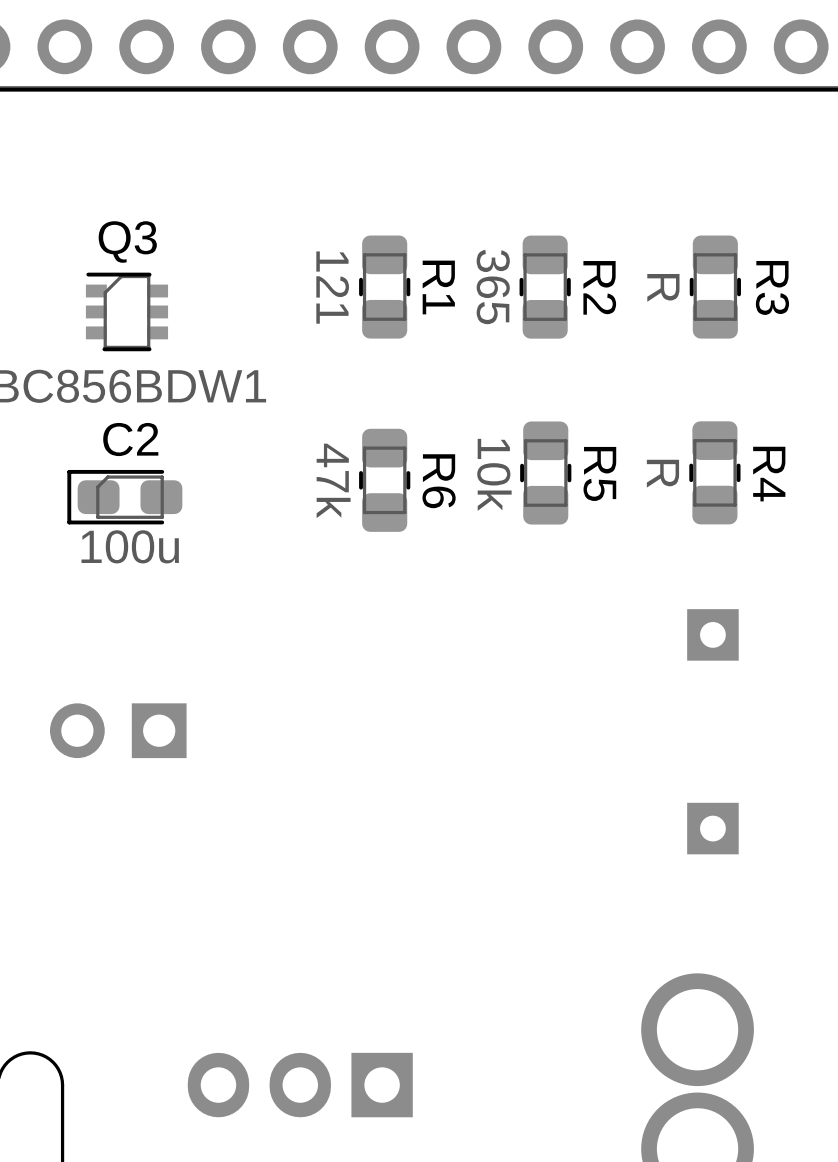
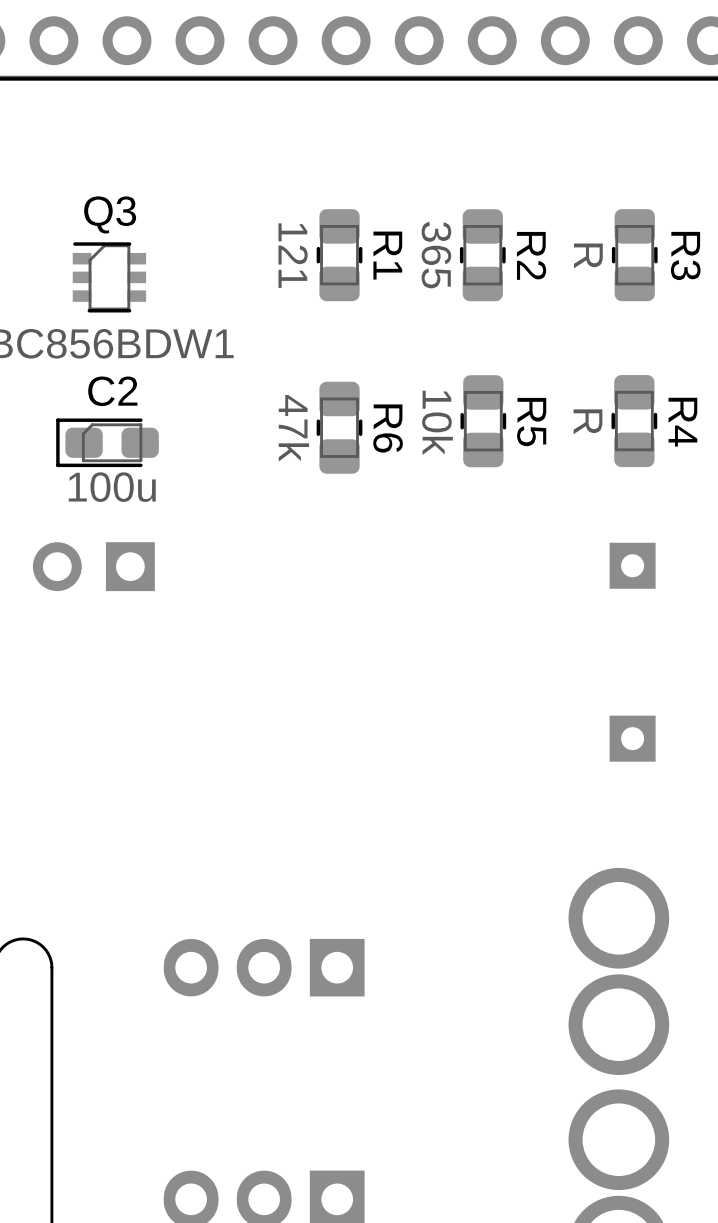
part position: (118, 730) -> (93, 566)

